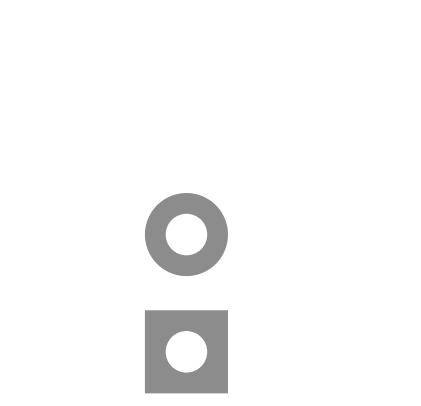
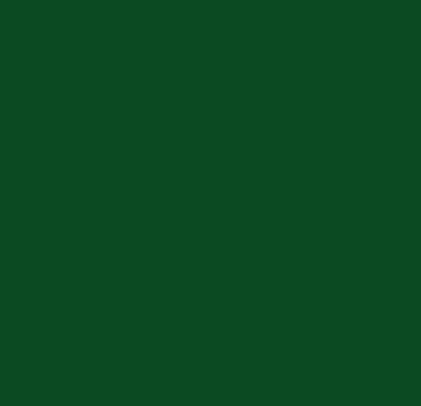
part: (186, 293) -> none

